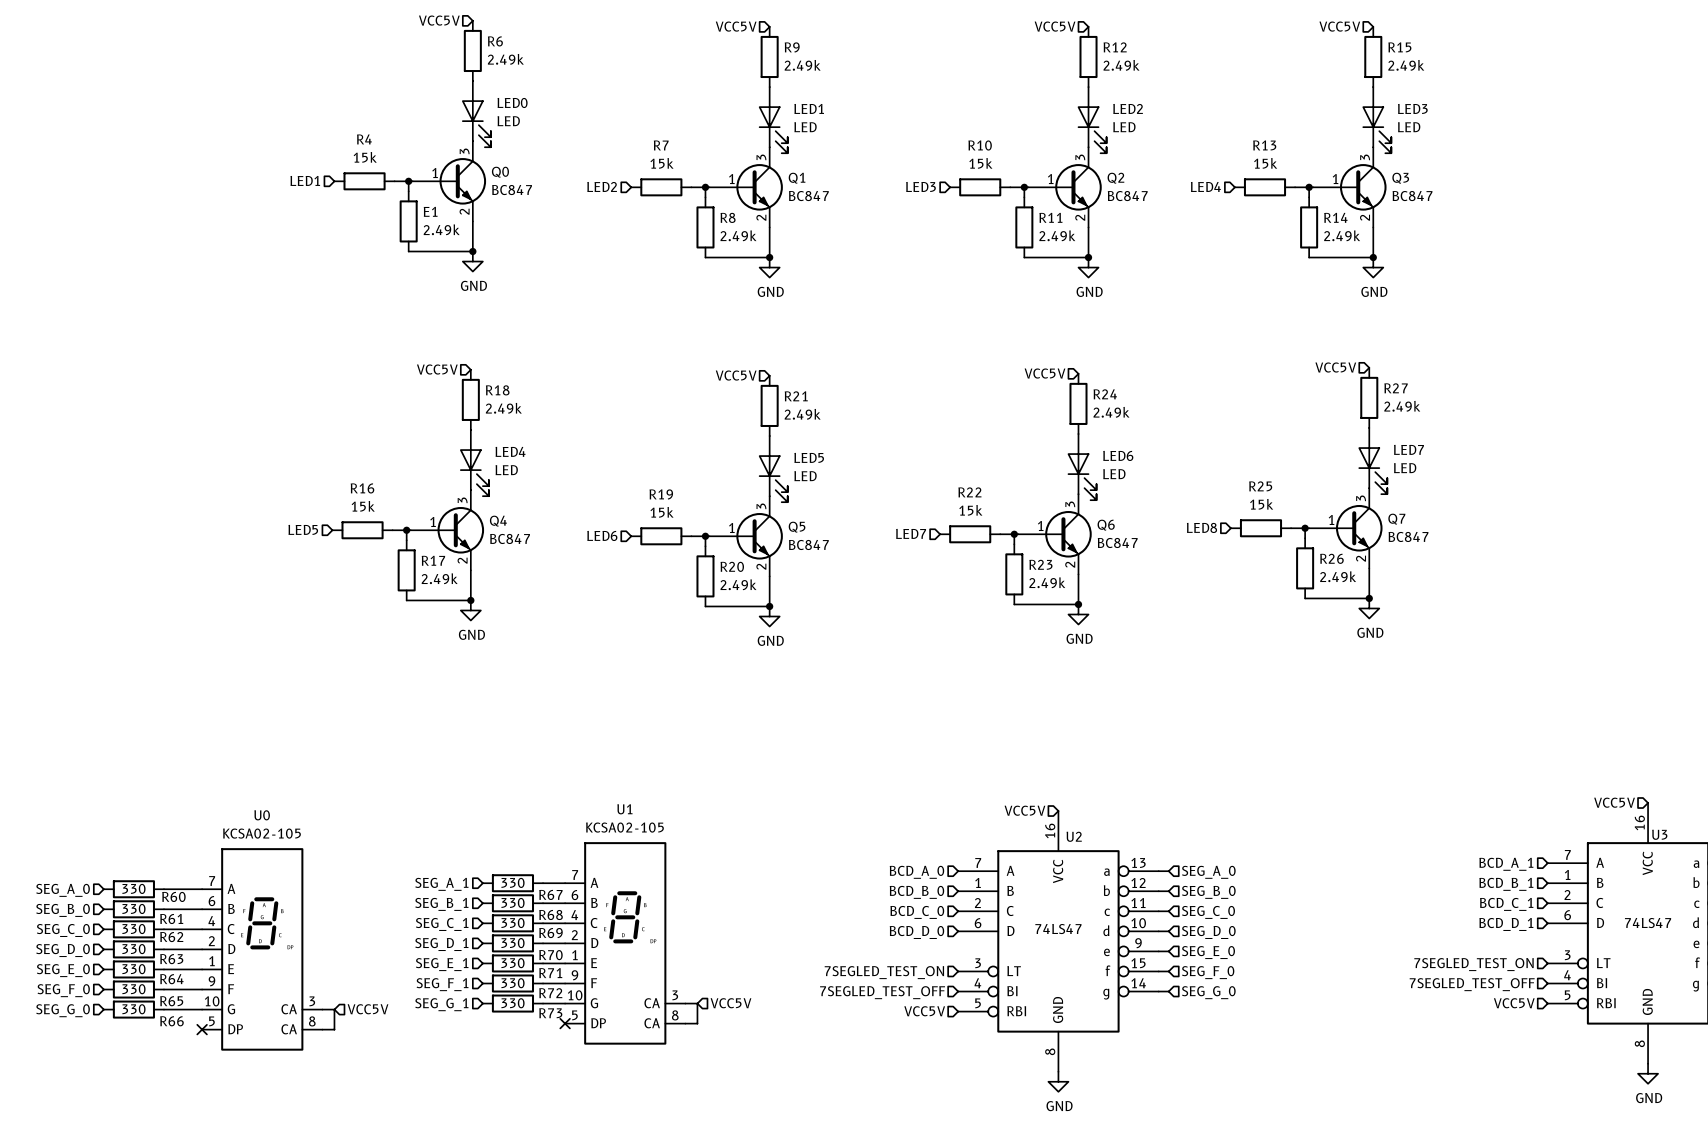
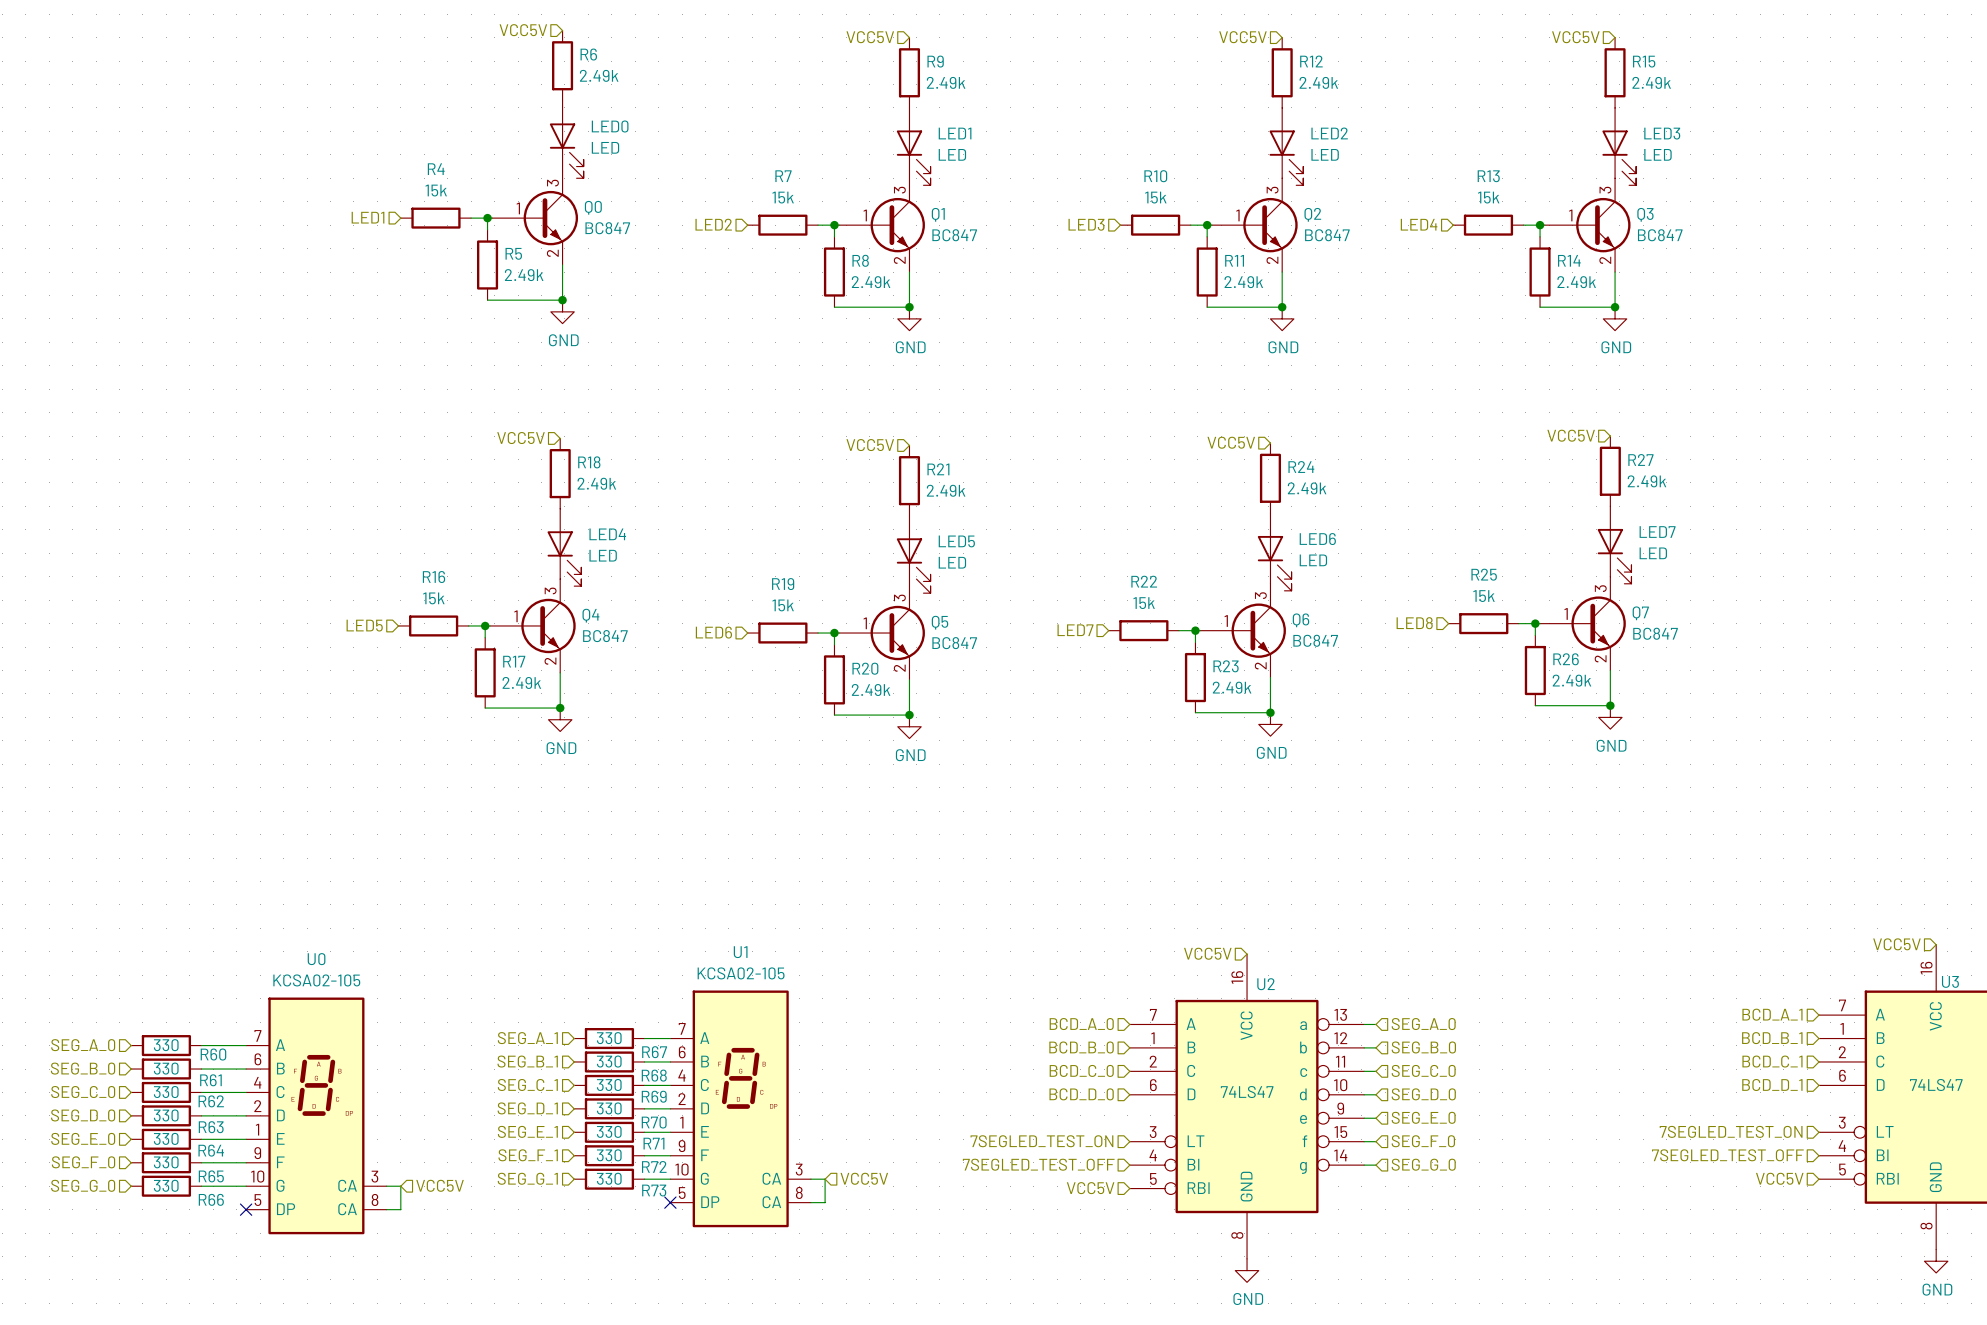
E1 name: E1 (430, 211) -> R5 (513, 253)

